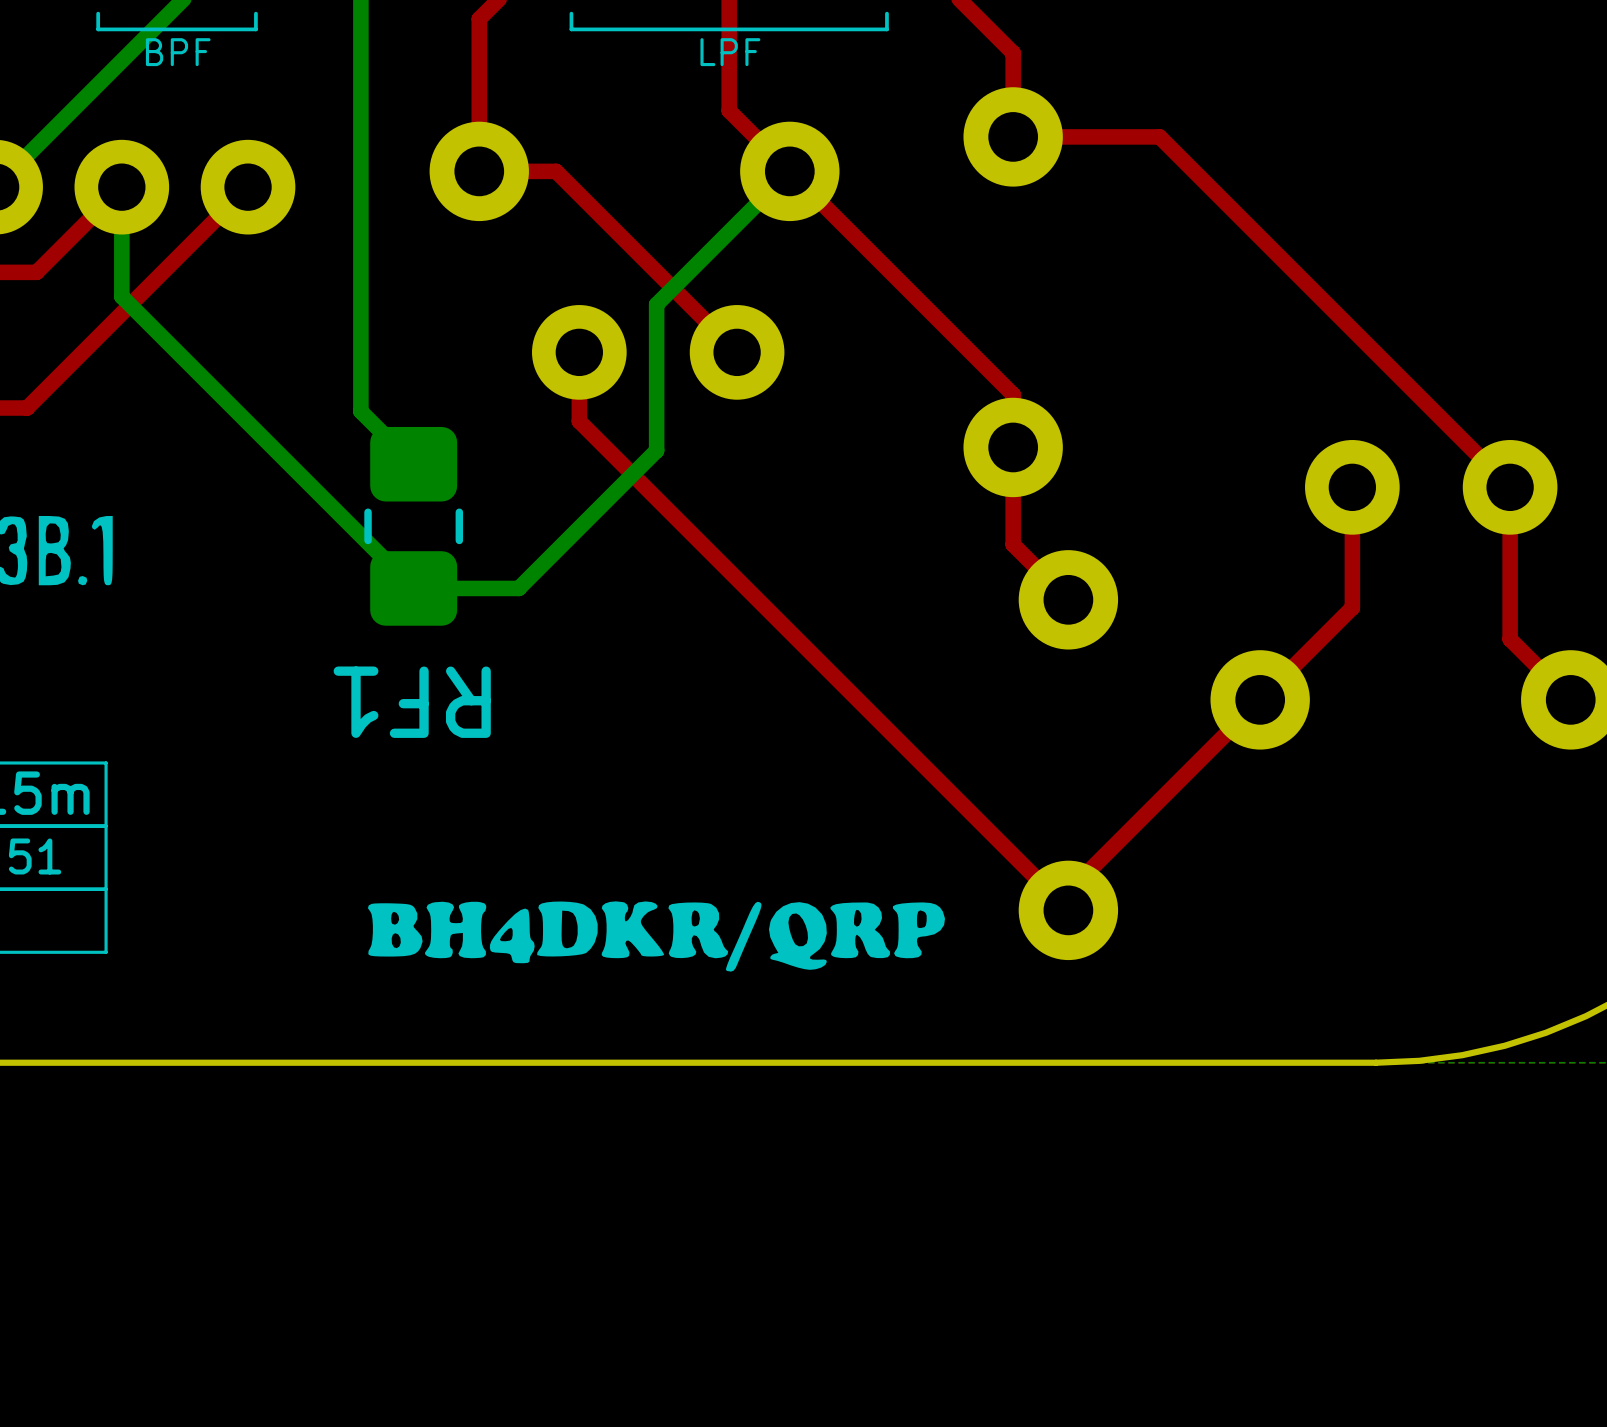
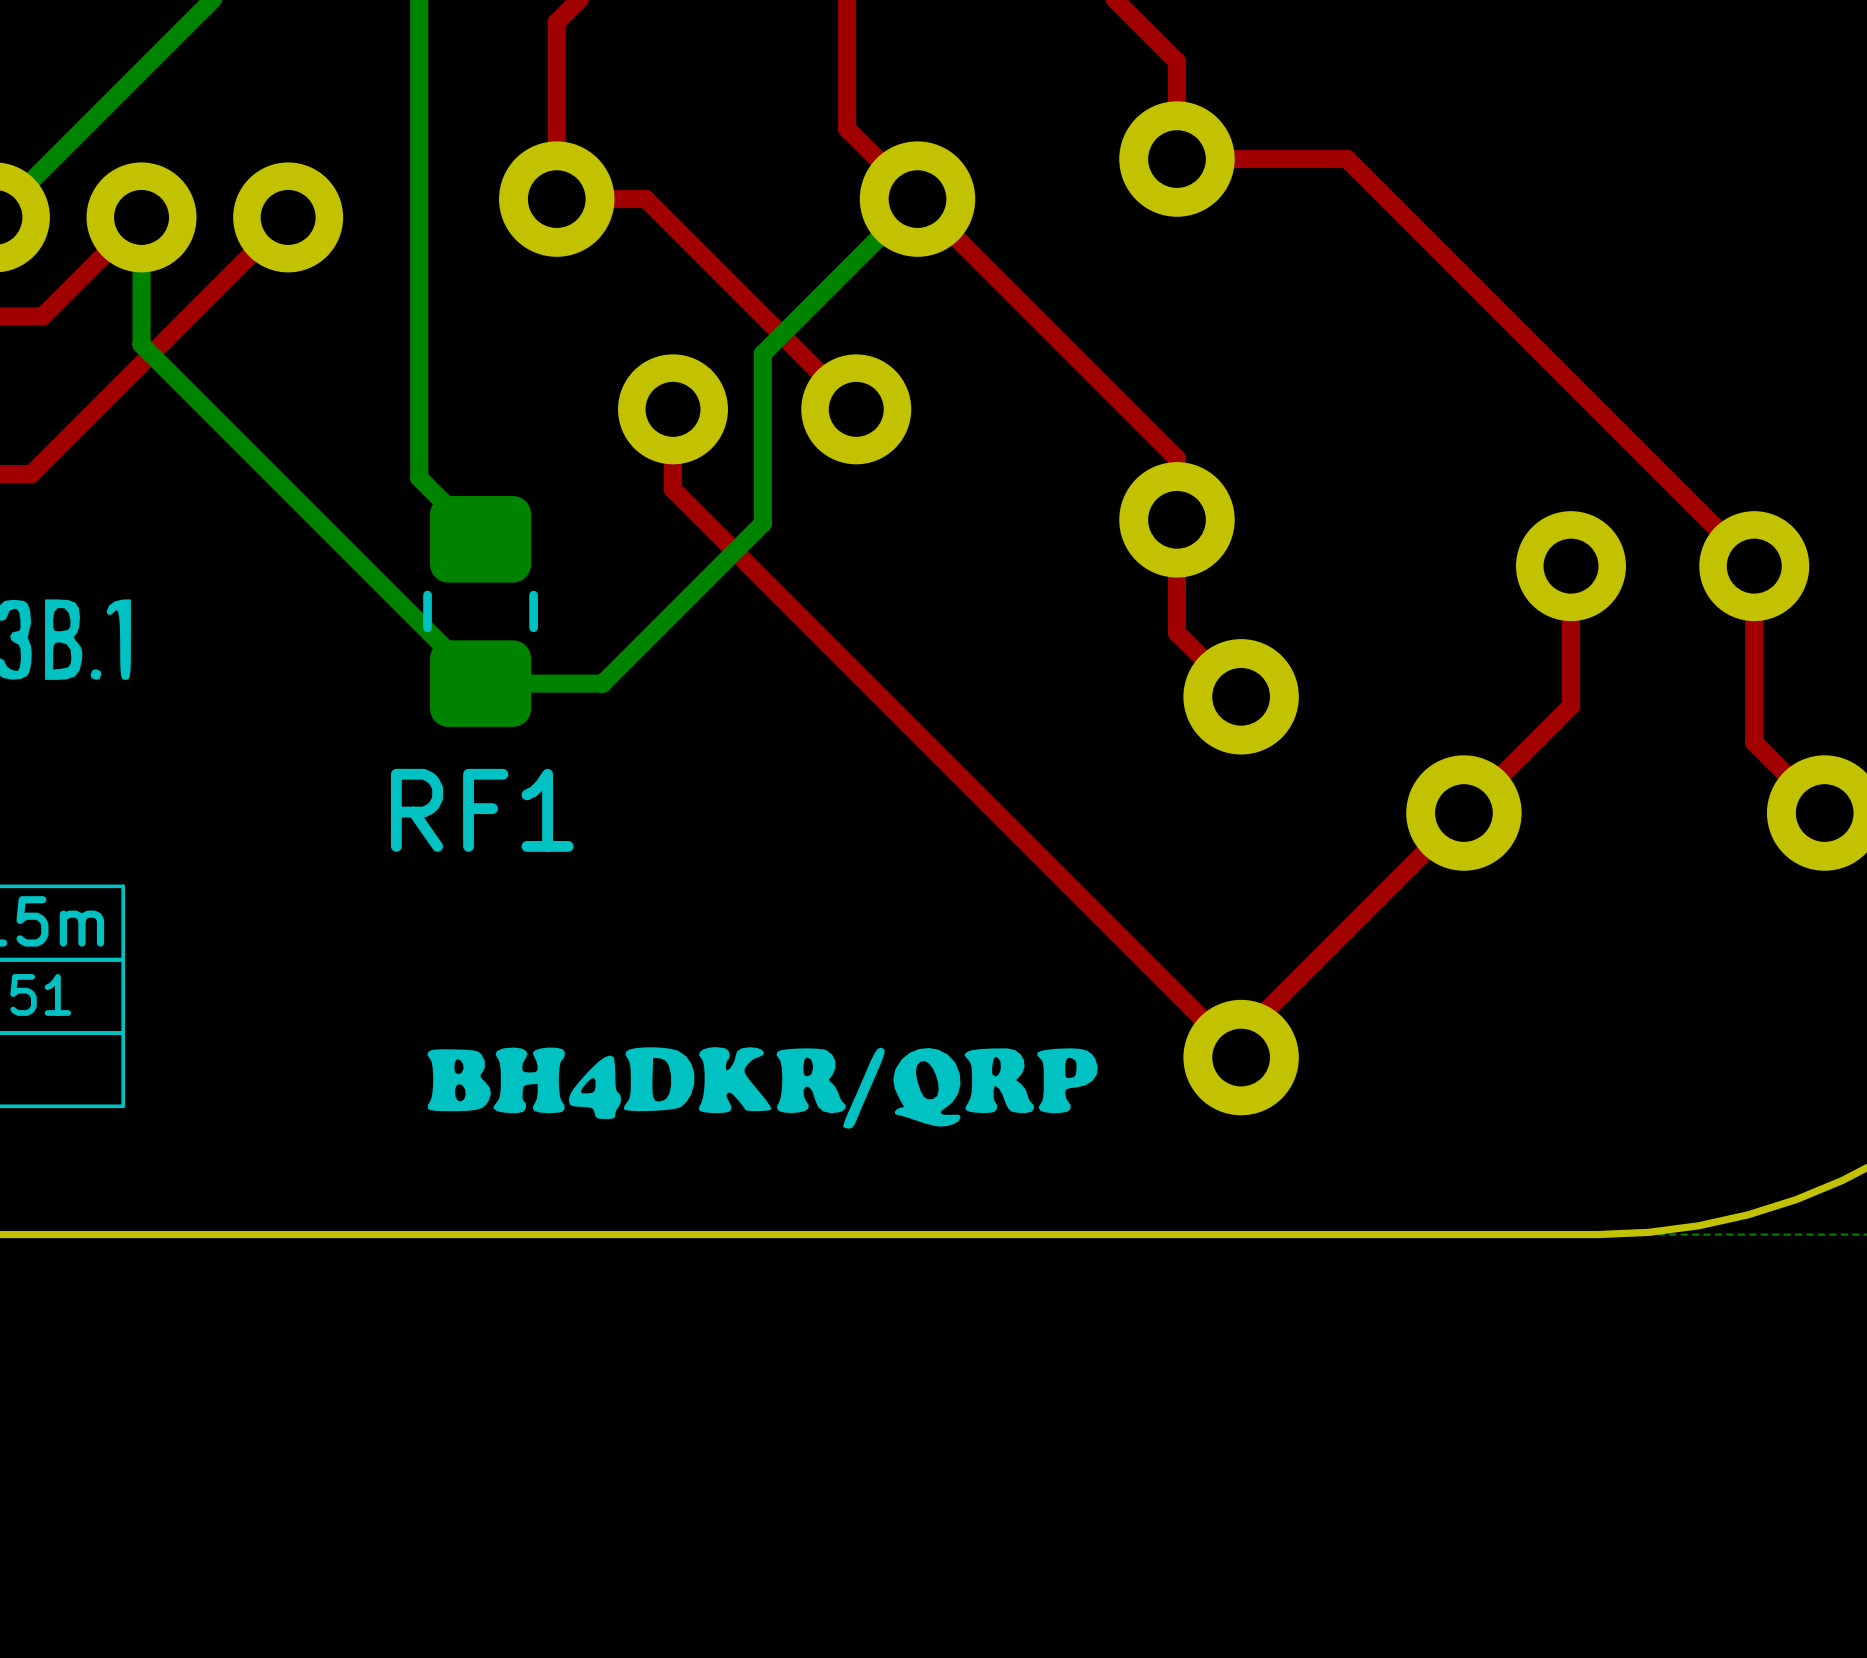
line: (255, 13) (255, 29) (98, 29) (98, 13) -> none
line: (886, 13) (886, 29) (571, 29) (571, 13) -> none
text: BPF (178, 52) -> none
text: LPF (730, 52) -> none
RF1 name rotation: 0° (412, 702) -> 180° (482, 810)

